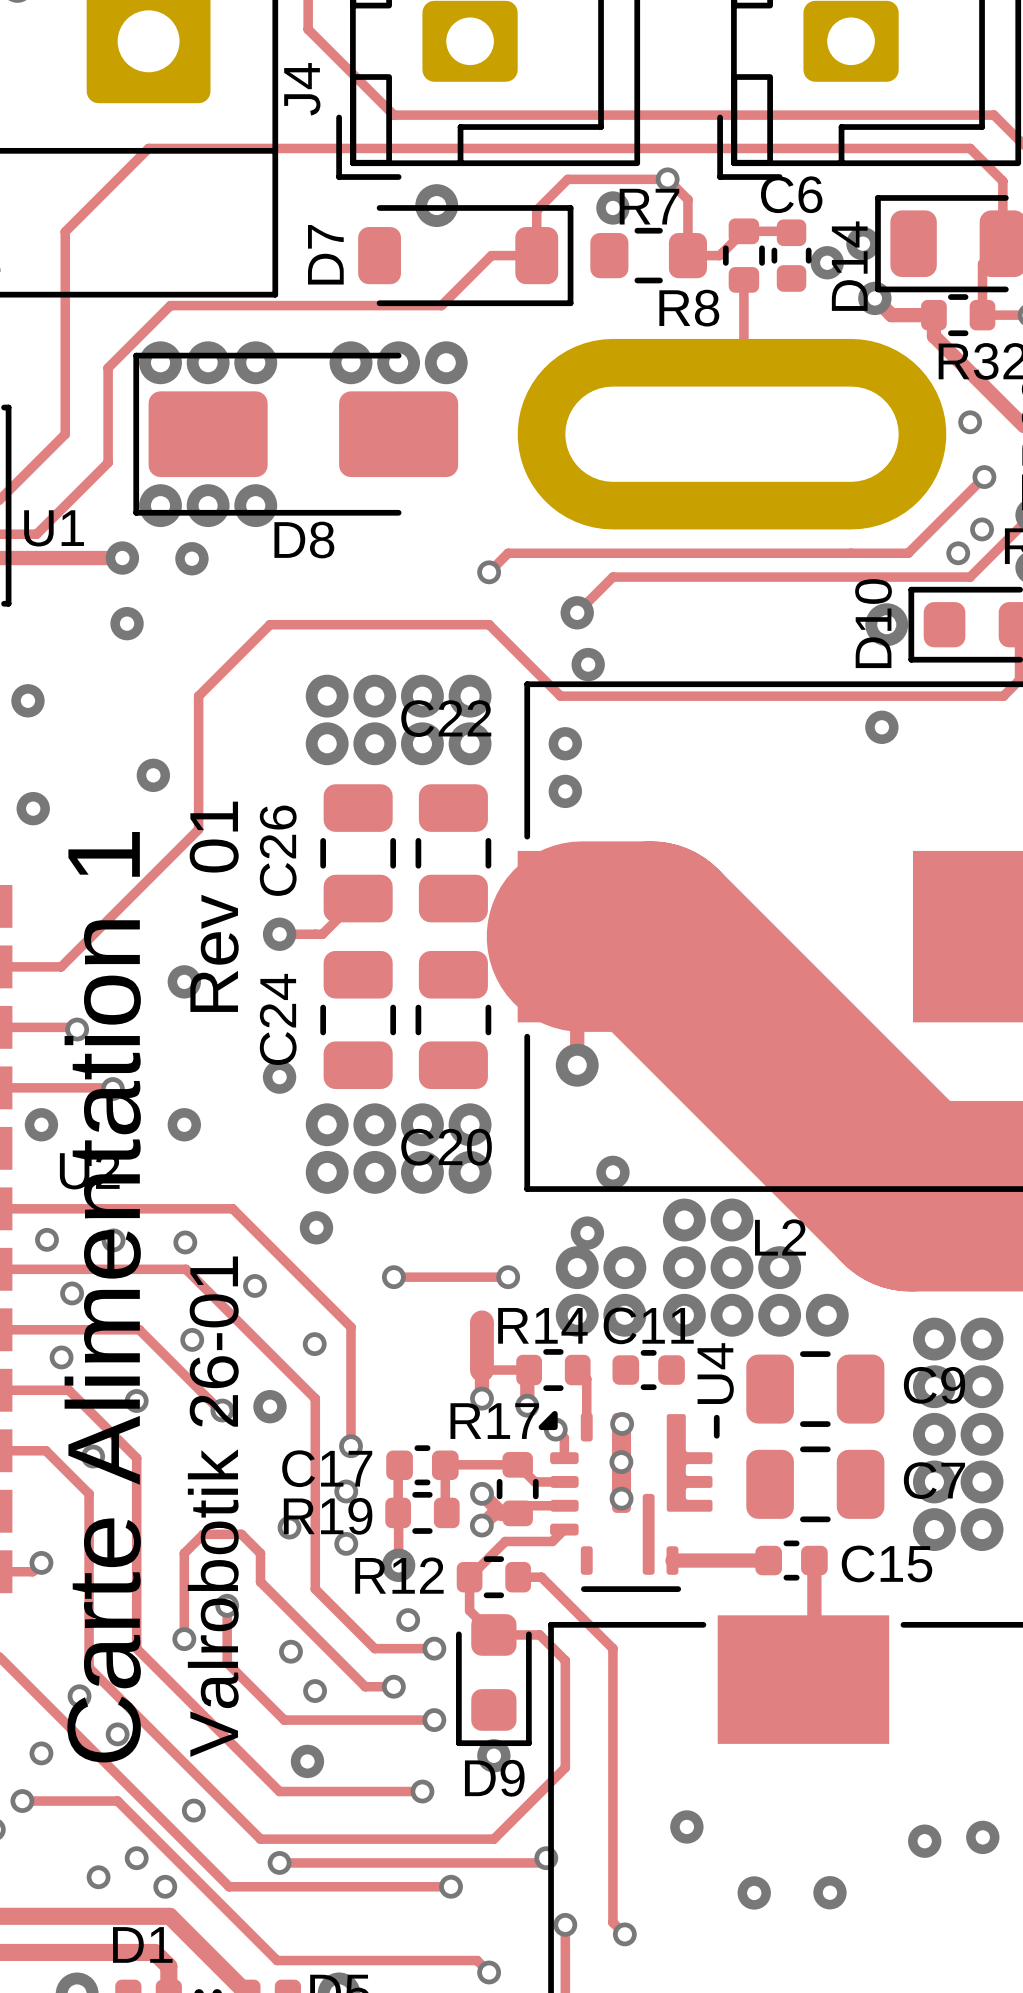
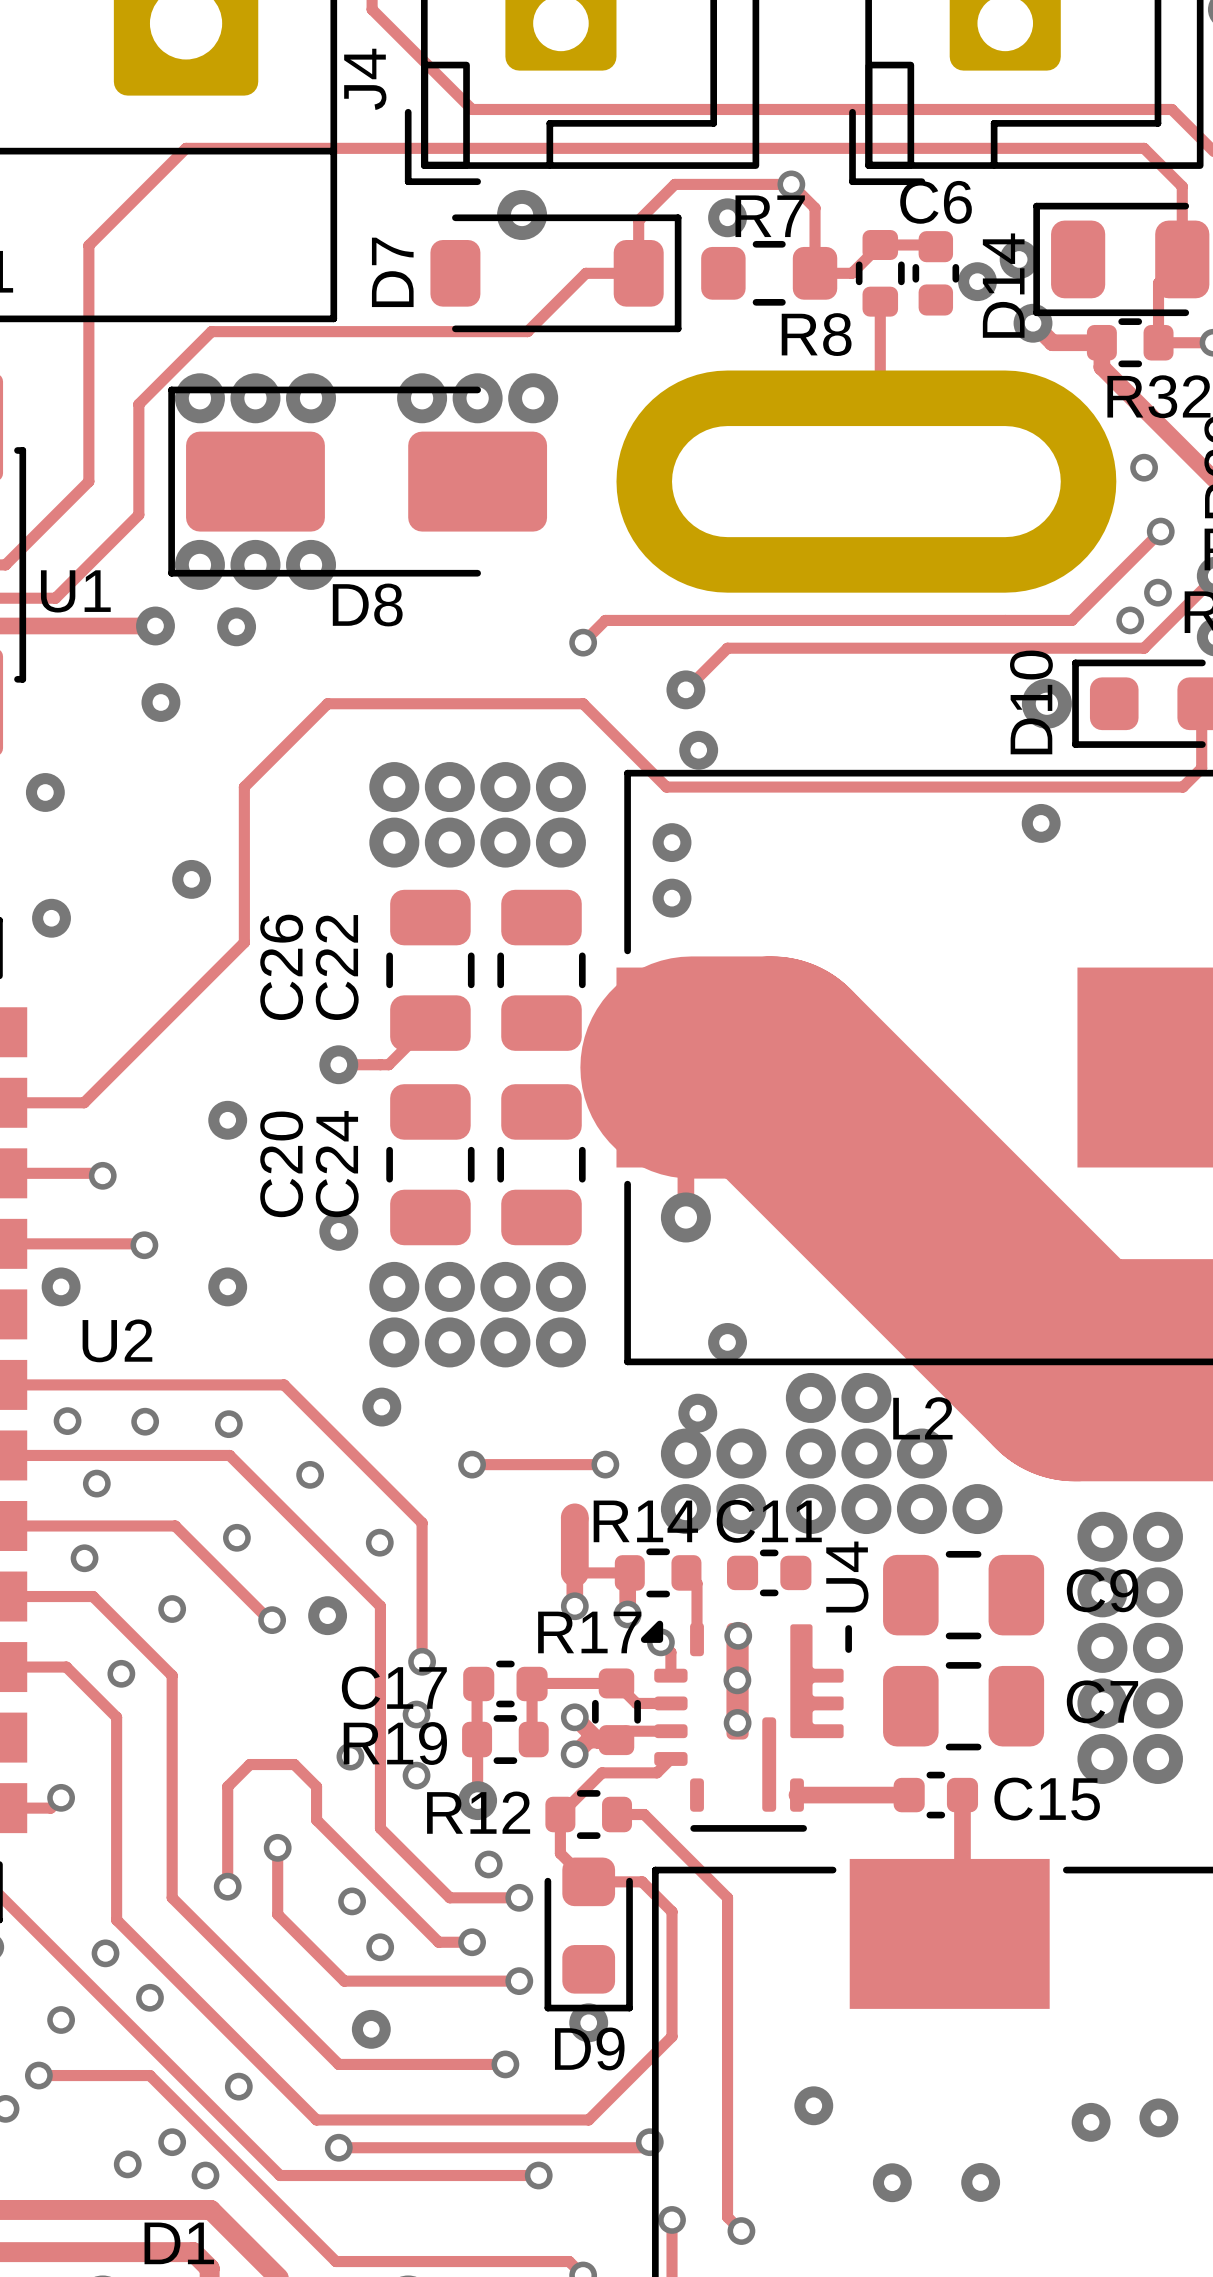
C22 name rotation: 0° (446, 718) -> 90° counterclockwise (337, 967)
C22 name position: C22 (446, 718) -> C22 (337, 967)
C26 name position: C26 (278, 850) -> C26 (281, 967)
text: Rev 01 (214, 906) -> none
C20 name rotation: 0° (446, 1147) -> 90° counterclockwise (281, 1164)
C20 name position: C20 (446, 1147) -> C20 (281, 1164)
text: Carte Alimentation 1 (102, 1297) -> none
text: Valrobotik 26-01 (213, 1506) -> none

